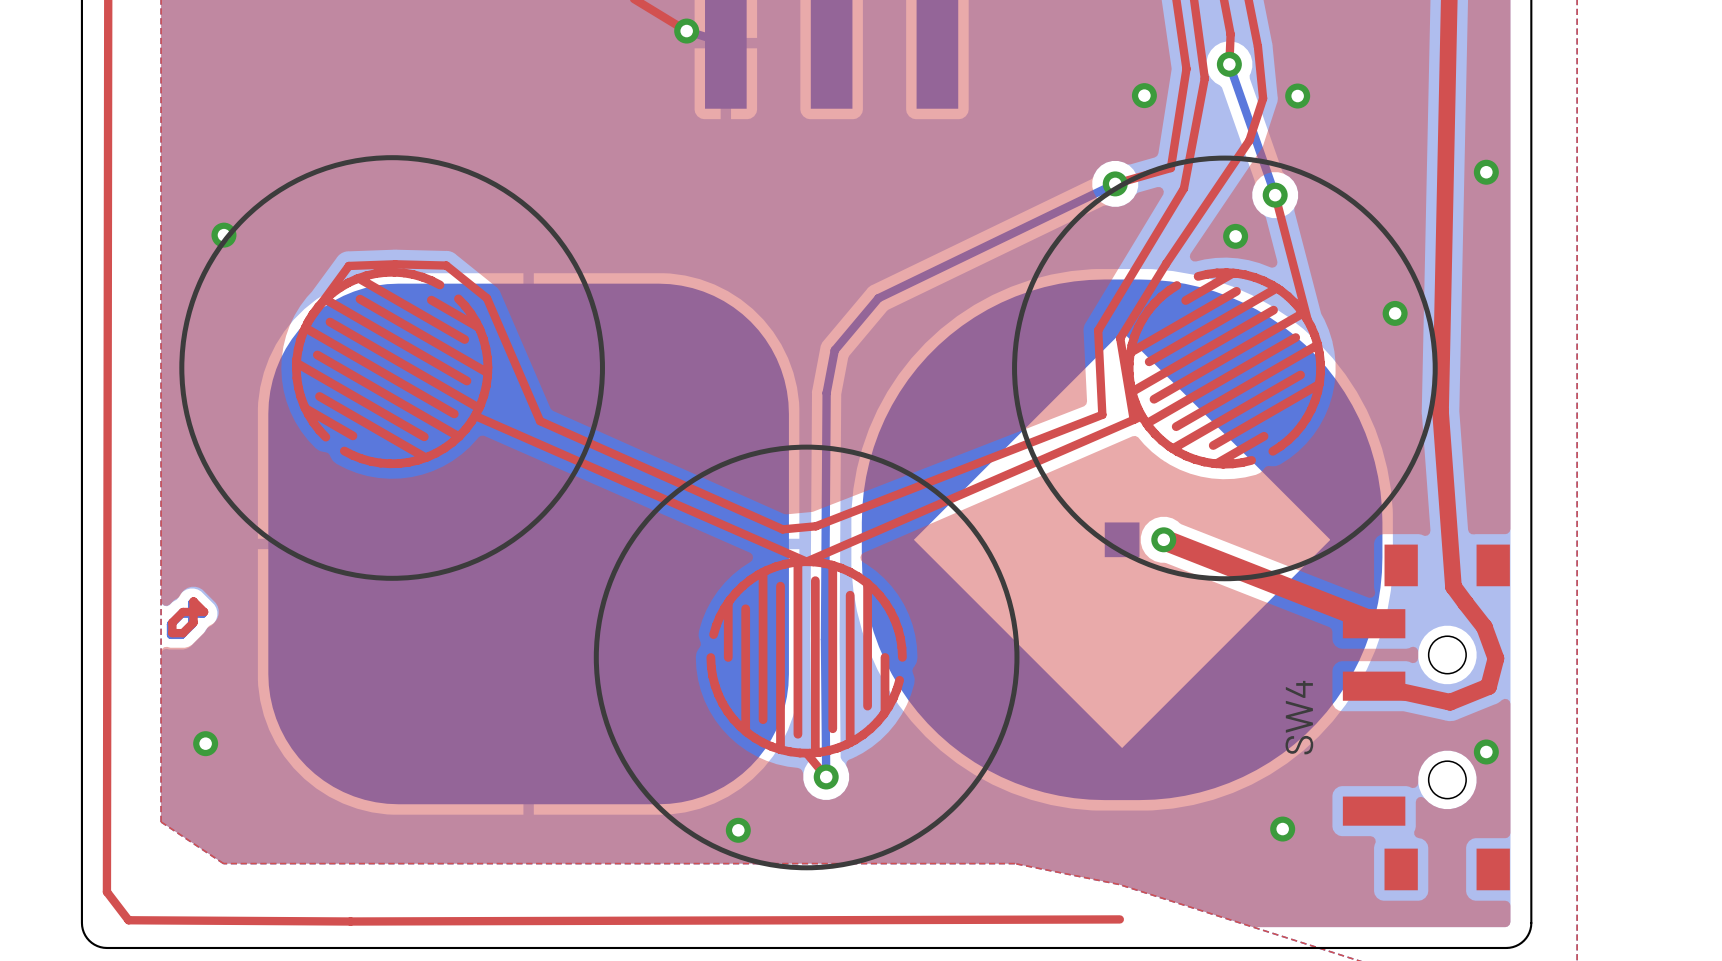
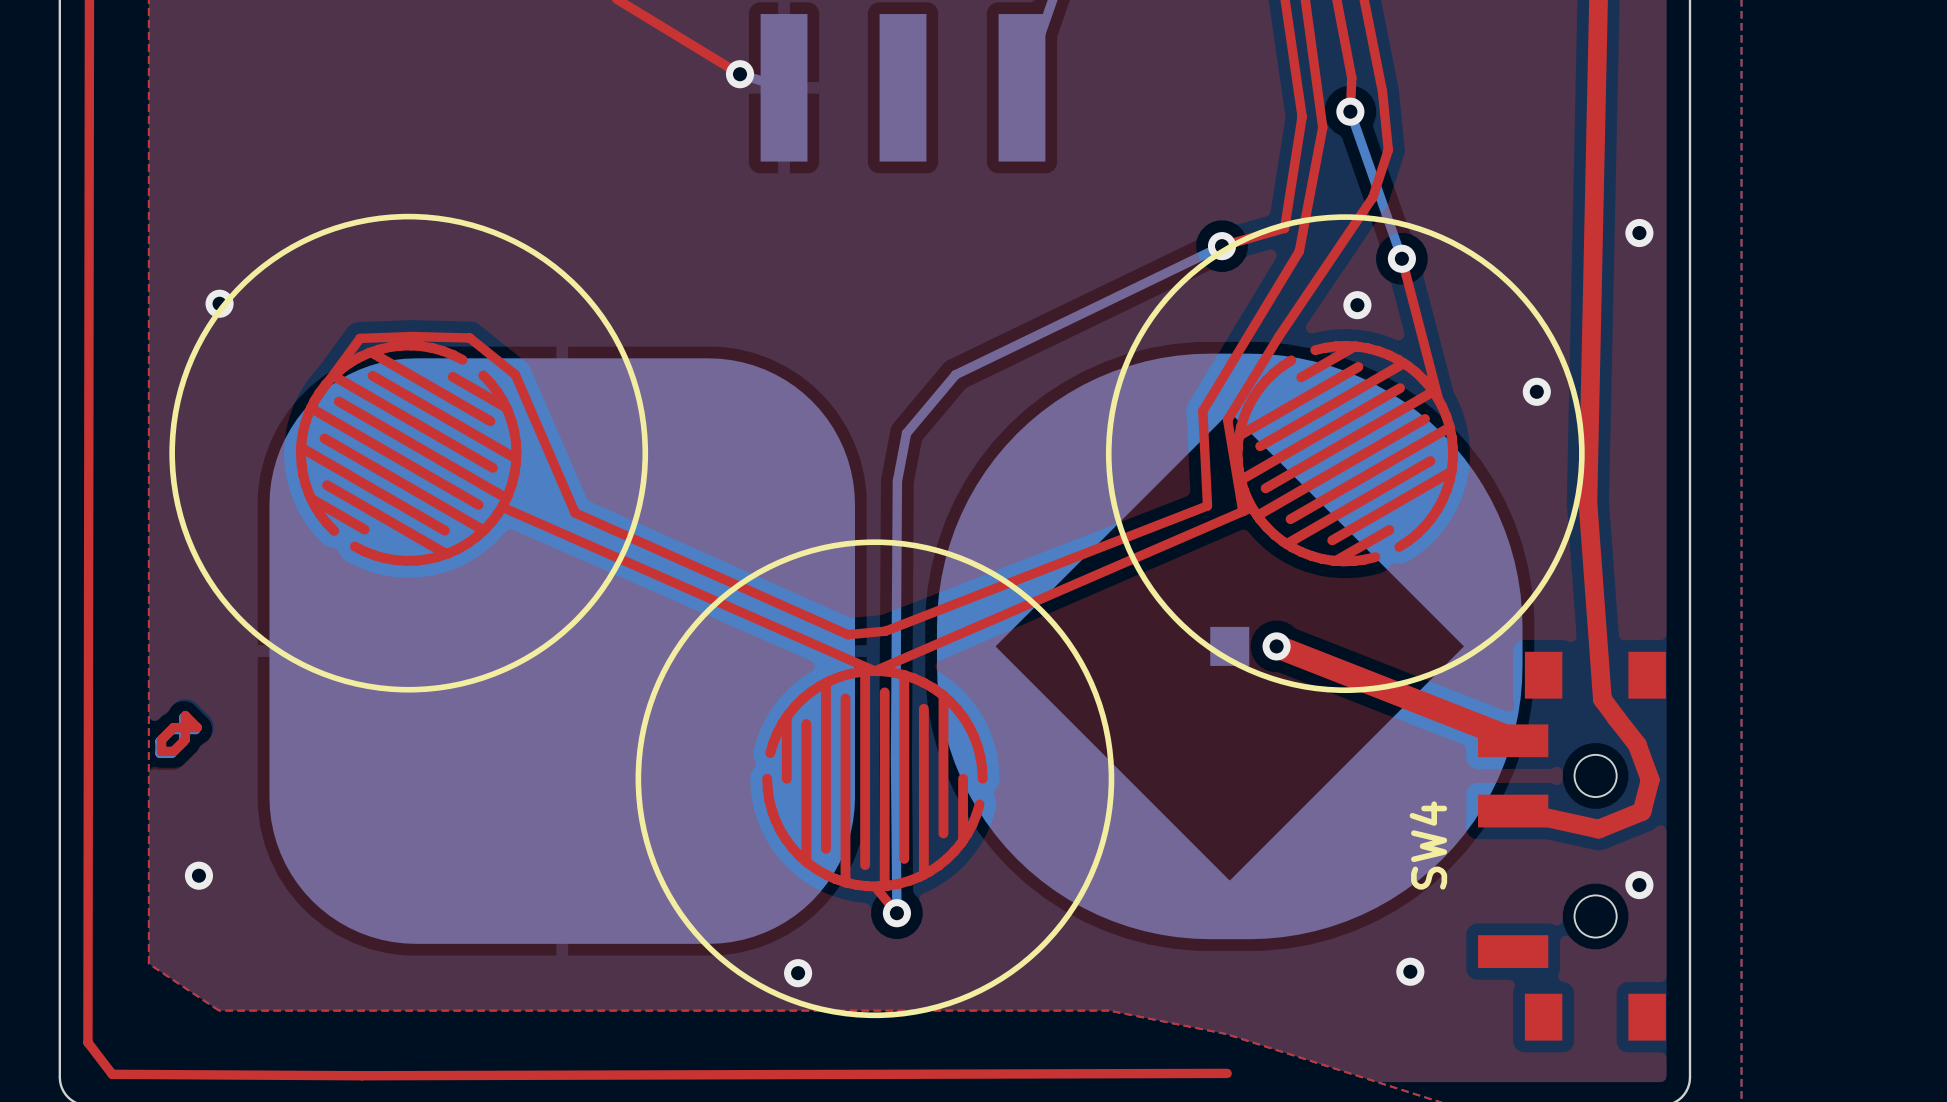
via: (1144, 95) -> none
via: (1297, 96) -> none

